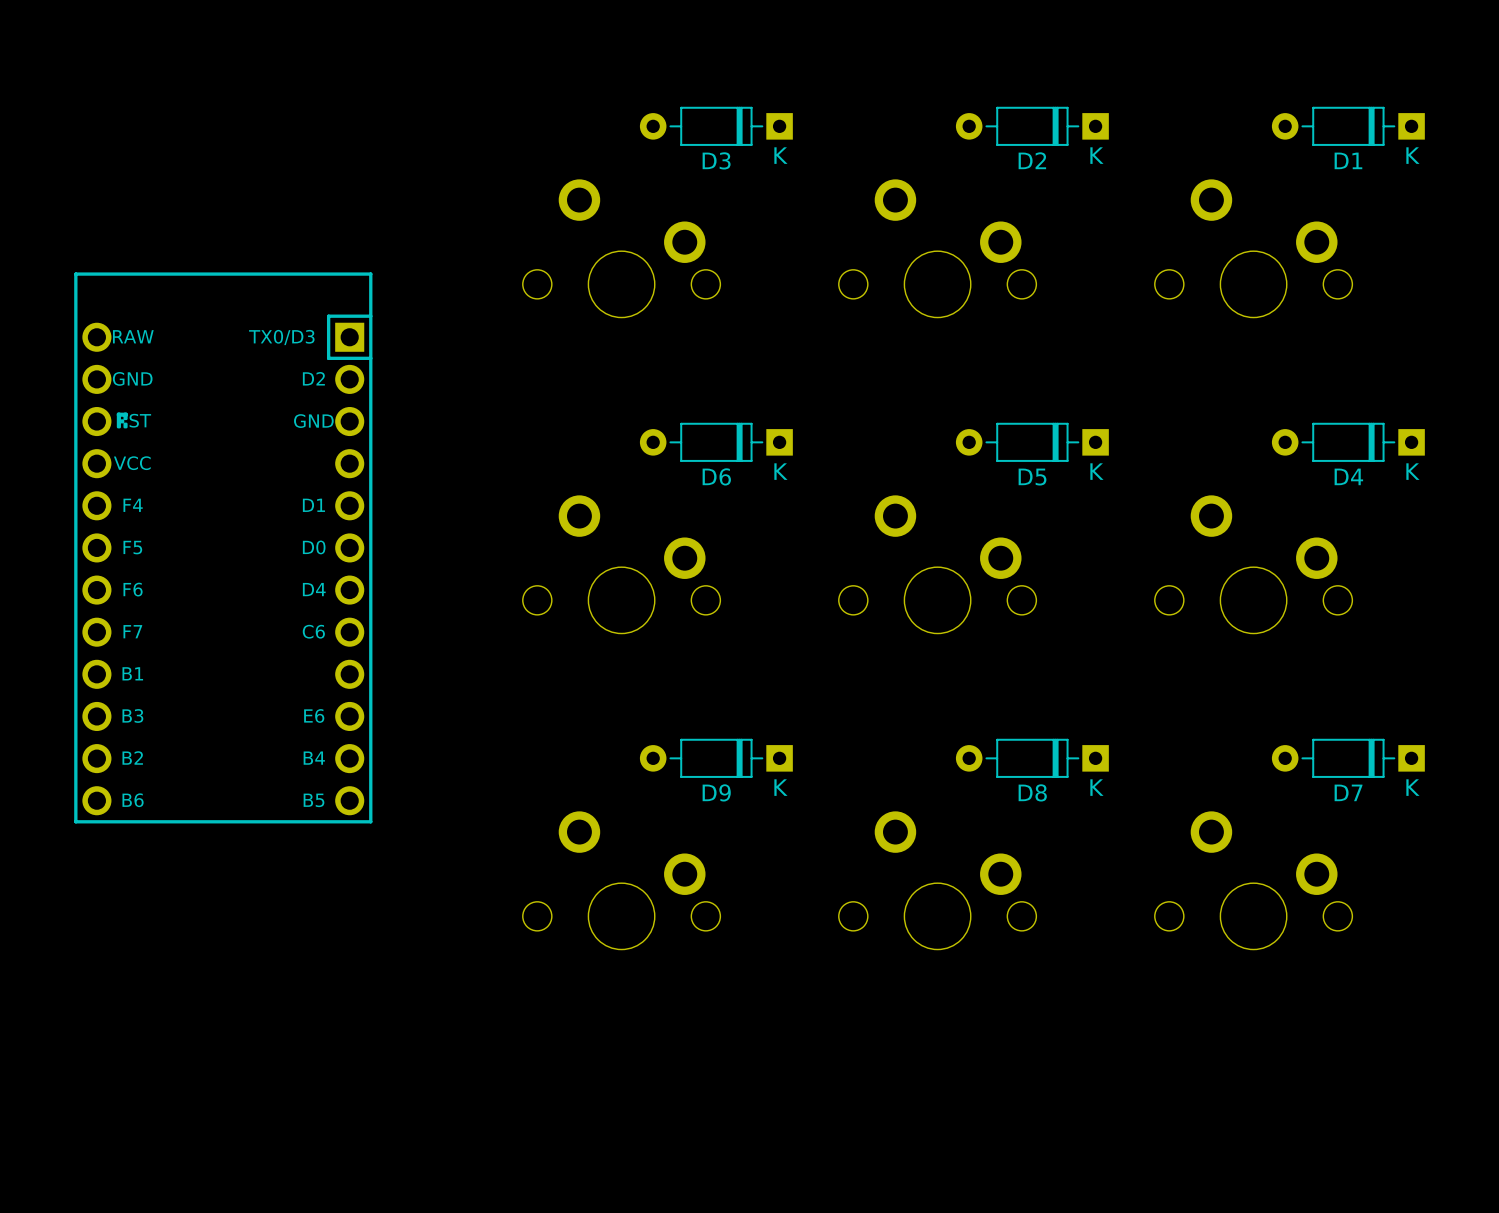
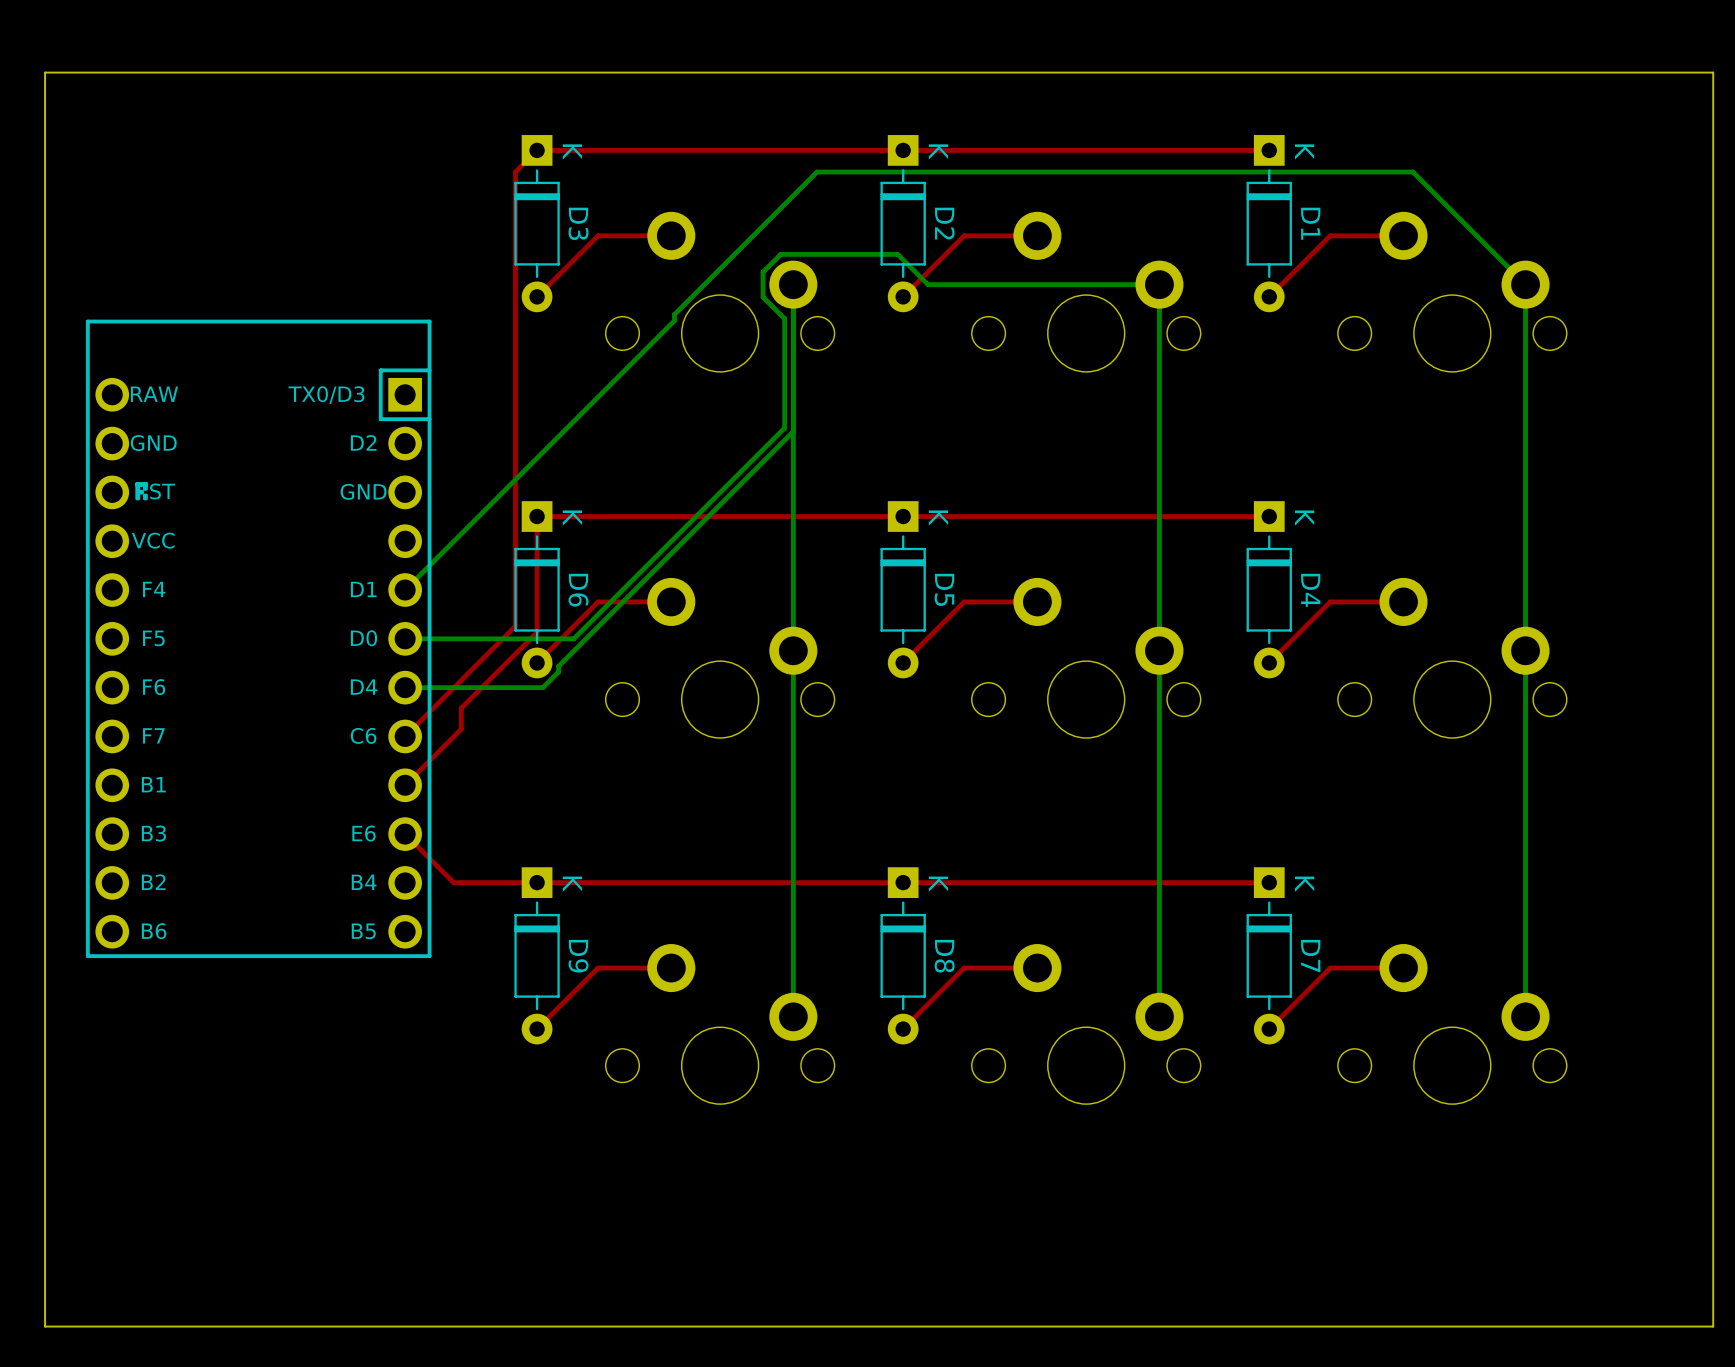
board edge: none -> (1713, 72) (45, 72) (45, 1326) (1713, 1326) (1713, 72)
D3 rotation: 0° (716, 126) -> 90° counterclockwise (537, 223)
D3 position: (716, 126) -> (537, 223)
D2 rotation: 0° (1032, 126) -> 90° counterclockwise (903, 223)
D2 position: (1032, 126) -> (903, 223)
top track: none -> (1269, 150) (537, 150) (515, 172) (515, 626) (405, 736)
D1 rotation: 0° (1348, 126) -> 90° counterclockwise (1269, 223)
D1 position: (1348, 126) -> (1269, 223)
top track: none -> (671, 235) (598, 235) (537, 296)
top track: none -> (1037, 235) (964, 235) (903, 296)
top track: none -> (1403, 235) (1330, 235) (1269, 296)
bottom track: none -> (793, 284) (793, 1016)
bottom track: none -> (793, 431) (558, 666) (558, 671) (542, 687) (405, 687)
D6 rotation: 0° (716, 442) -> 90° counterclockwise (537, 589)
D6 position: (716, 442) -> (537, 589)
D5 rotation: 0° (1032, 442) -> 90° counterclockwise (903, 589)
D5 position: (1032, 442) -> (903, 589)
top track: none -> (1269, 516) (537, 516) (537, 632) (461, 708) (461, 729) (405, 785)
D4 rotation: 0° (1348, 442) -> 90° counterclockwise (1269, 589)
D4 position: (1348, 442) -> (1269, 589)
bottom track: none -> (405, 590) (674, 320) (674, 314) (817, 172) (1412, 172) (1525, 284) (1525, 1016)
top track: none -> (671, 601) (598, 601) (537, 662)
top track: none -> (1037, 601) (964, 601) (903, 662)
top track: none -> (1403, 601) (1330, 601) (1269, 662)
bottom track: none -> (405, 638) (573, 638) (784, 428) (784, 318) (763, 297) (763, 272) (780, 254) (897, 254) (928, 284) (1159, 284) (1159, 1016)
top track: none -> (405, 834) (453, 882) (1269, 882)
D9 rotation: 0° (716, 758) -> 90° counterclockwise (537, 955)
D9 position: (716, 758) -> (537, 955)
D8 rotation: 0° (1032, 758) -> 90° counterclockwise (903, 955)
D8 position: (1032, 758) -> (903, 955)
D7 rotation: 0° (1348, 758) -> 90° counterclockwise (1269, 955)
D7 position: (1348, 758) -> (1269, 955)
top track: none -> (671, 968) (598, 968) (537, 1029)
top track: none -> (1037, 968) (964, 968) (903, 1029)
top track: none -> (1403, 968) (1330, 968) (1269, 1029)

